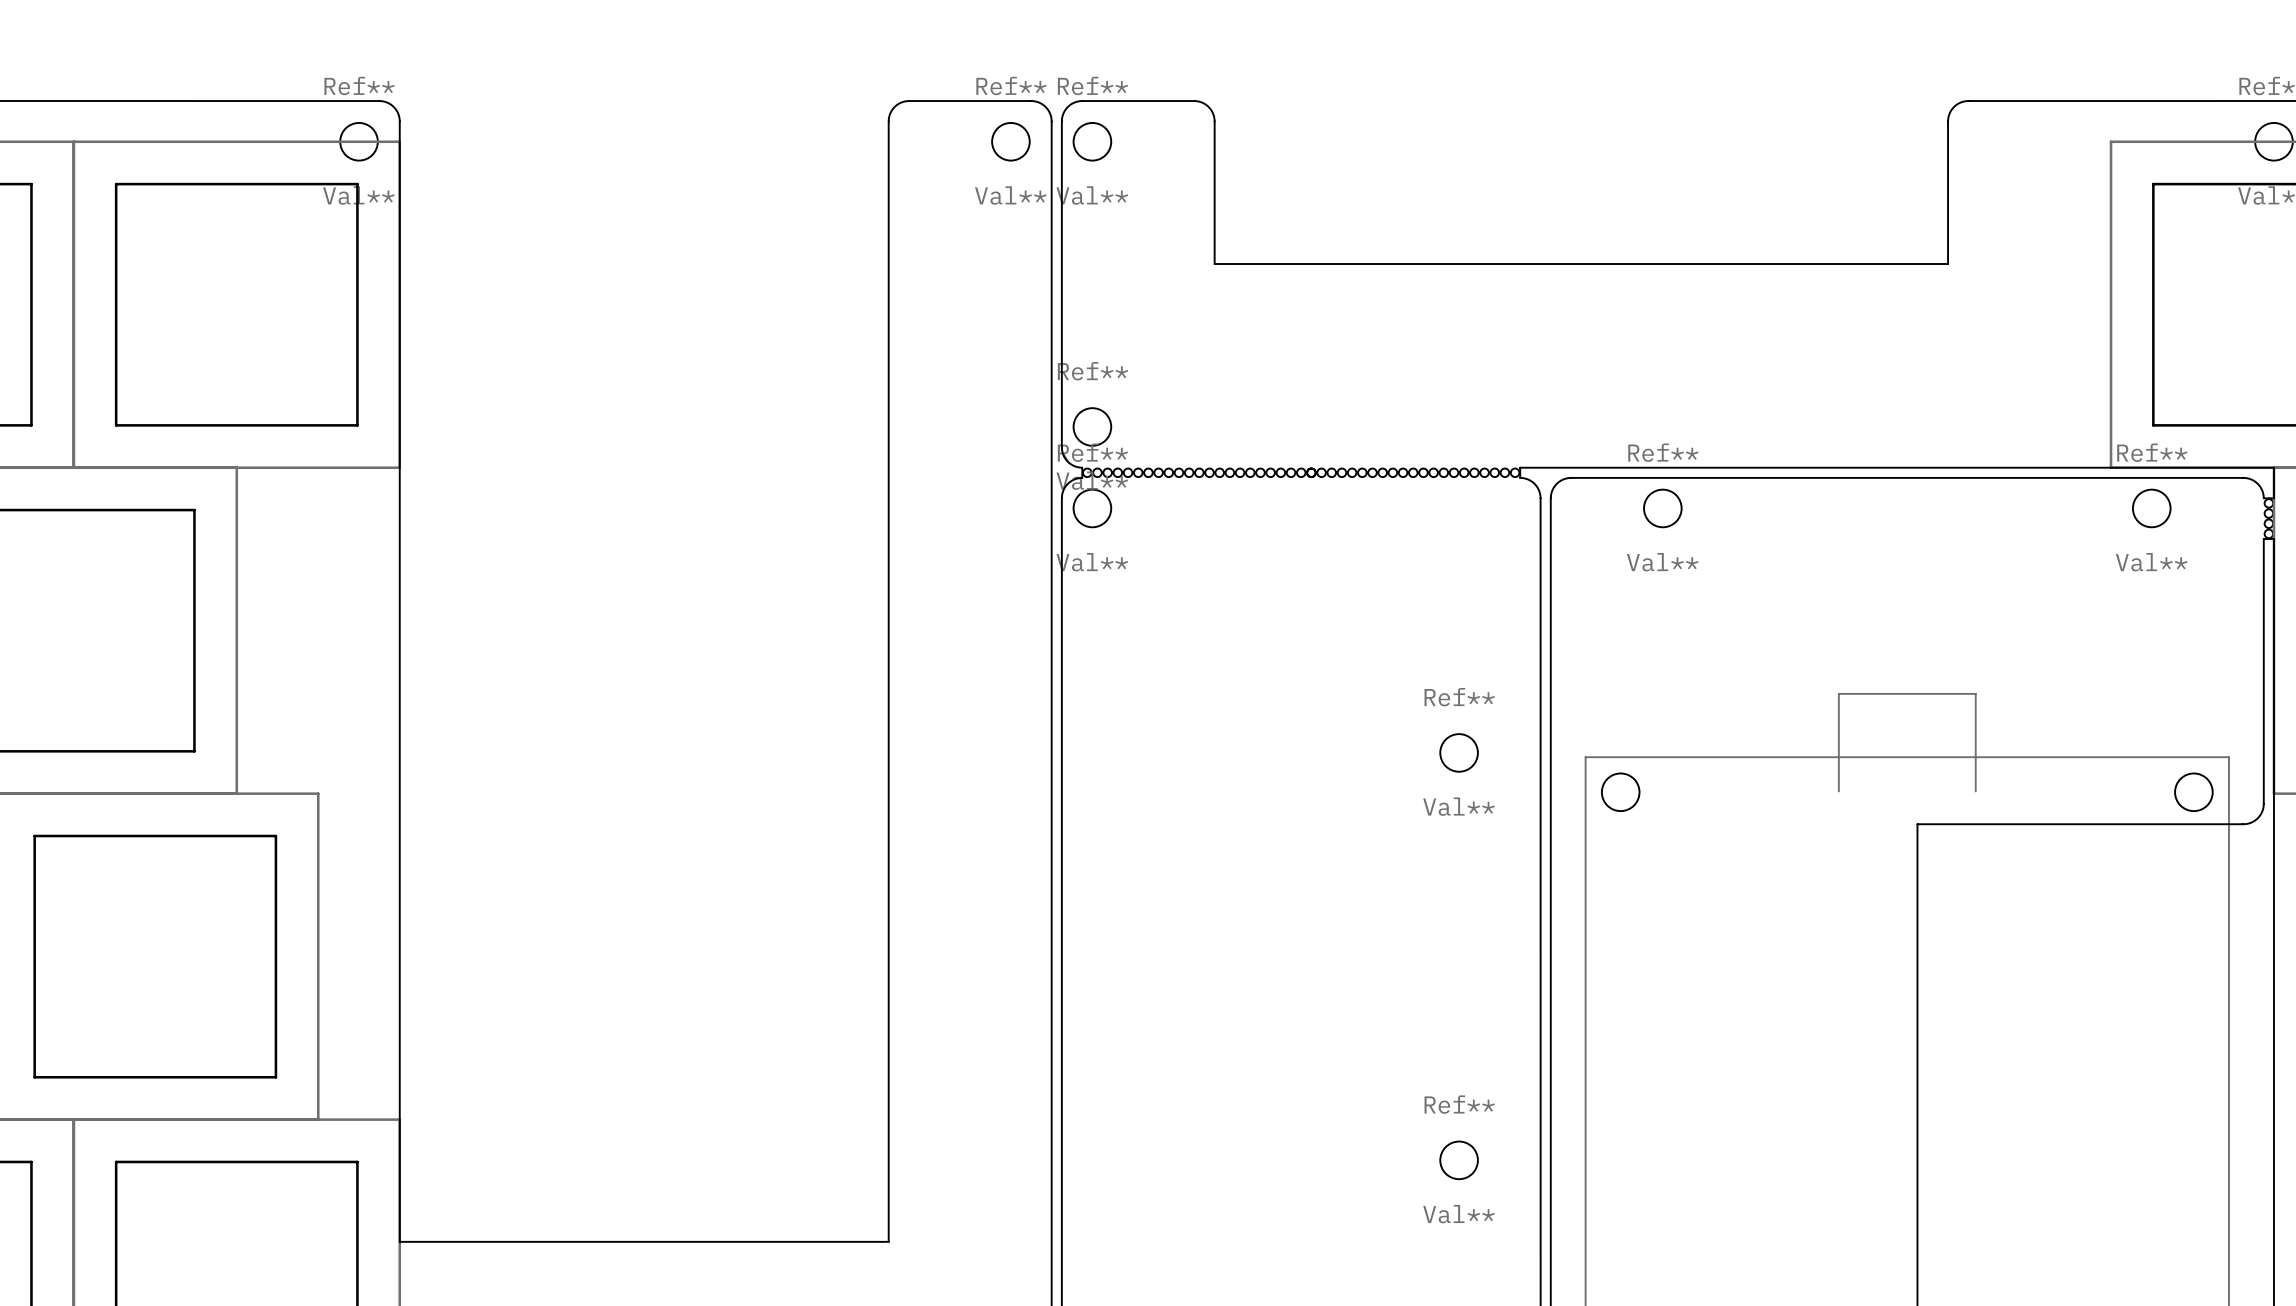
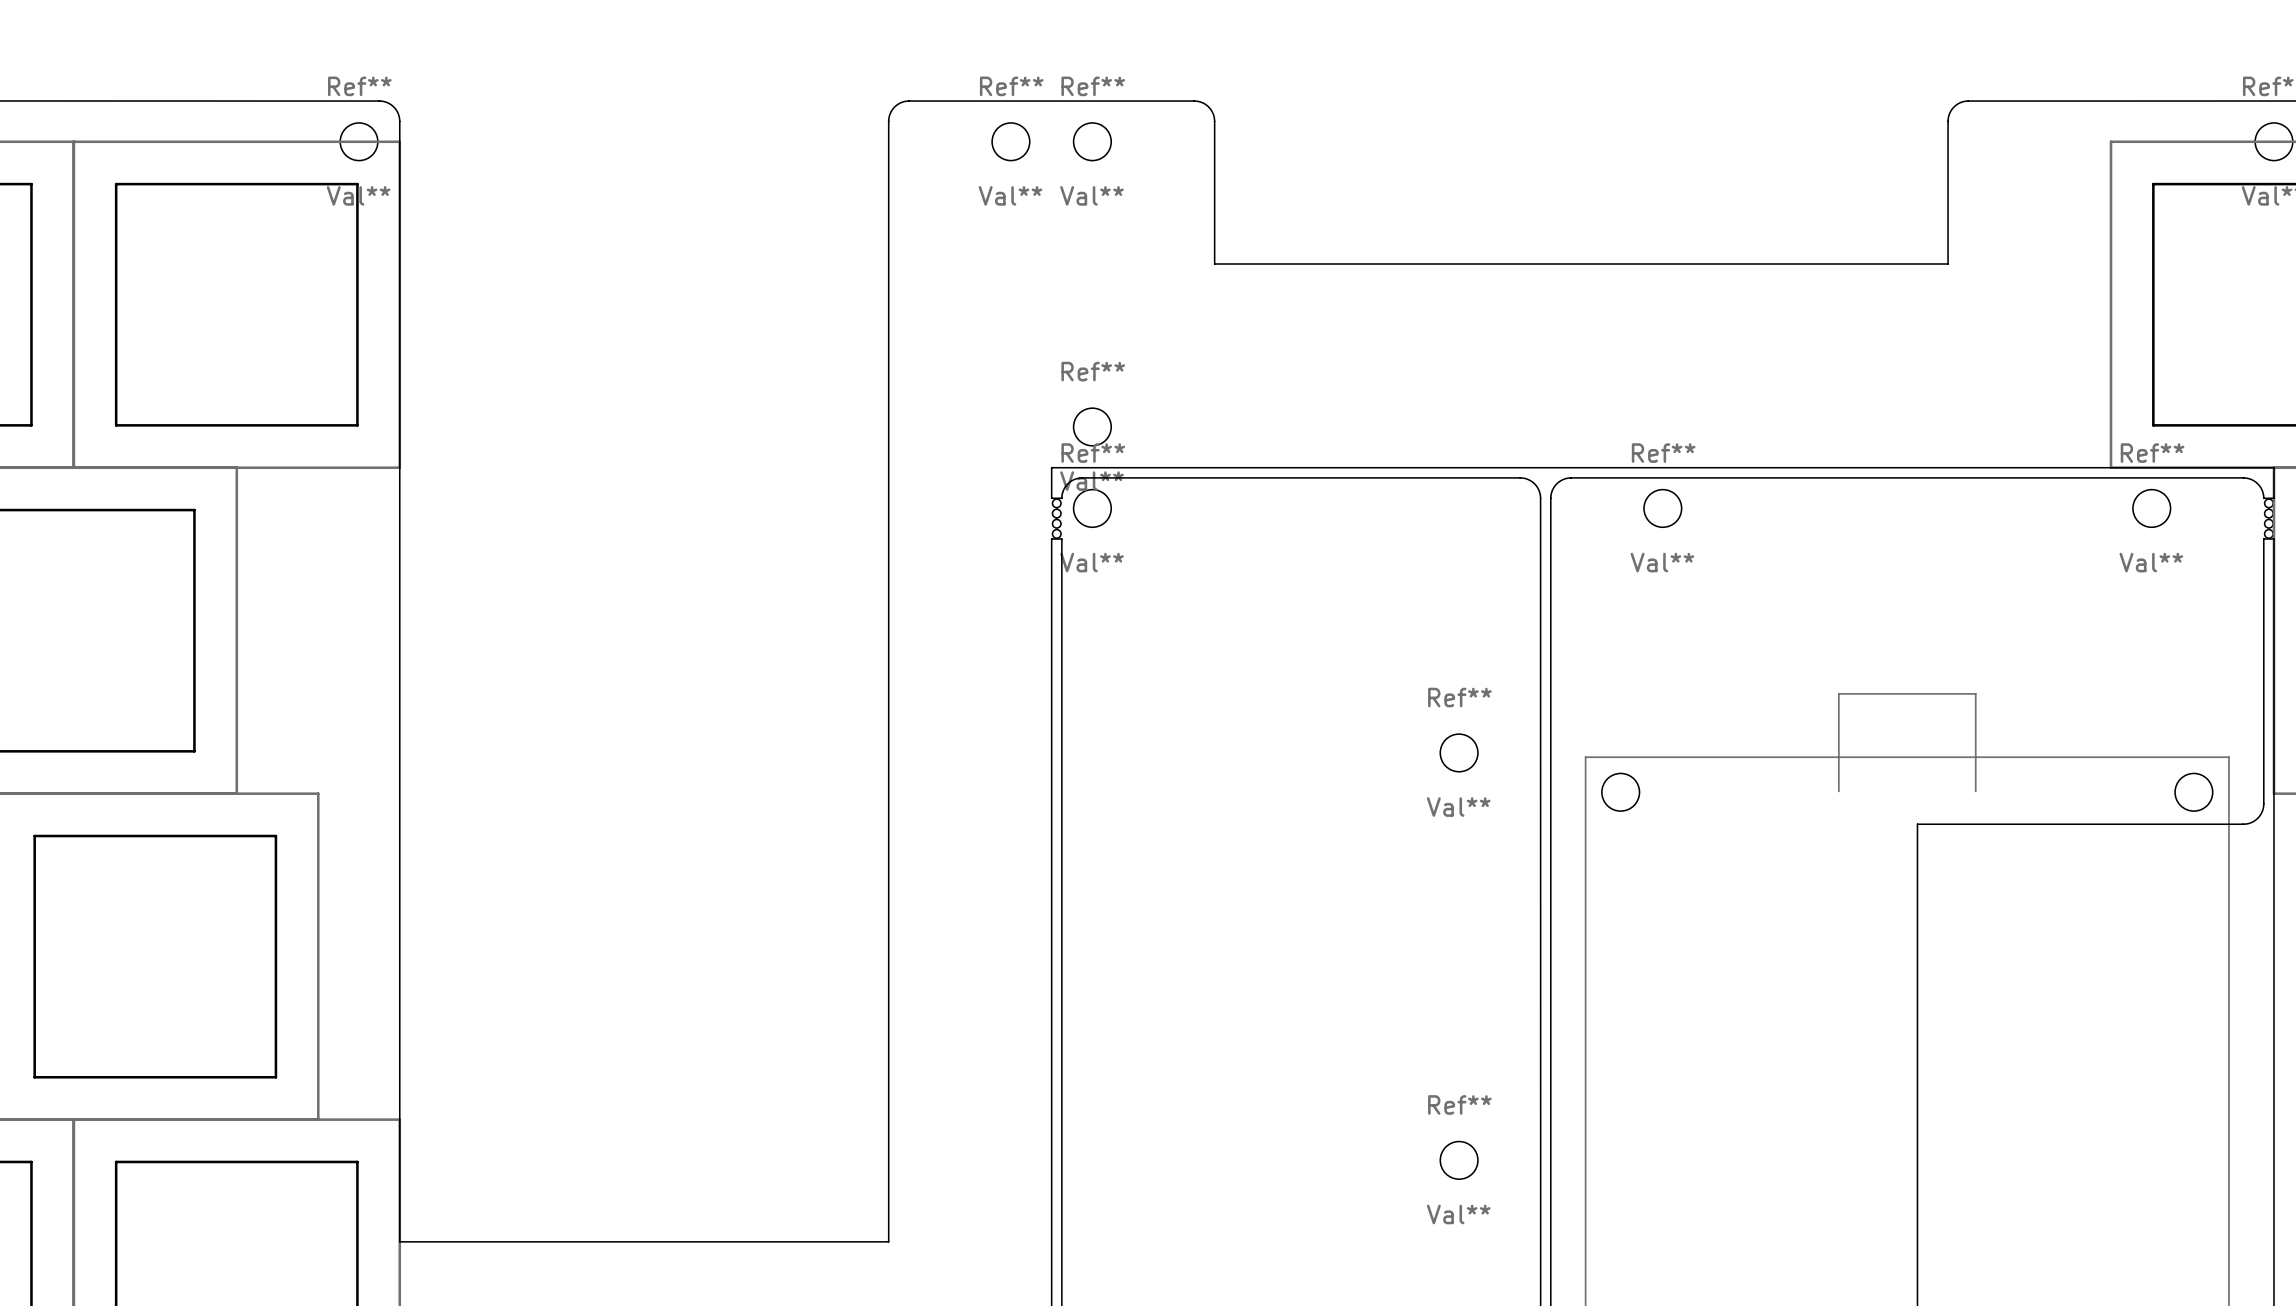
board edge: (1031, 101) (1039, 102) (1045, 106) (1050, 113) (1051, 121) (1051, 467) -> (1031, 101) (1082, 101)
board edge: (1082, 101) (1074, 102) (1067, 106) (1063, 113) (1061, 121) (1061, 447) (1063, 455) (1067, 461) (1074, 466) (1082, 467) (1082, 477) -> none
board edge: none -> (1051, 467) (1520, 467)
board edge: (1520, 467) (1520, 477) -> (1082, 477) (1520, 477)
part: (1102, 472) -> none
part: (1143, 472) -> none
part: (1184, 472) -> none
part: (1224, 472) -> none
part: (1265, 472) -> none
part: (1306, 472) -> none
part: (1311, 472) -> none
part: (1347, 472) -> none
part: (1387, 472) -> none
part: (1428, 472) -> none
part: (1469, 472) -> none
part: (1494, 472) -> none
part: (1504, 472) -> none
part: (1515, 472) -> none
board edge: (1051, 498) (1051, 539) -> none
part: none -> (1056, 518)

